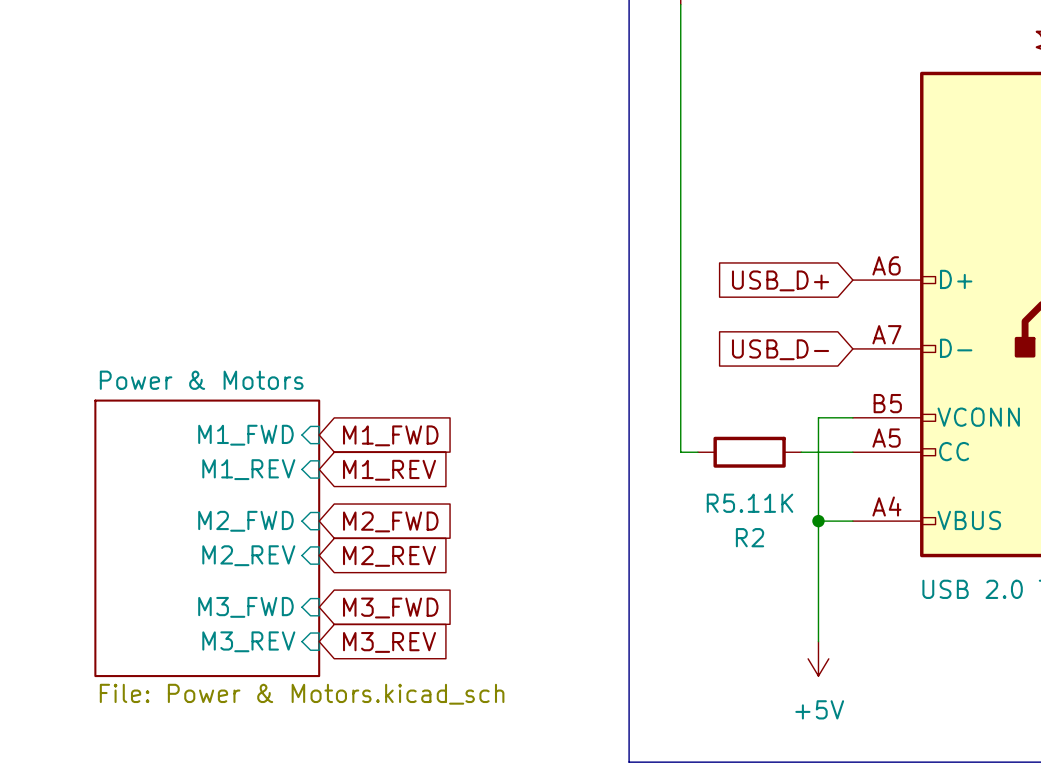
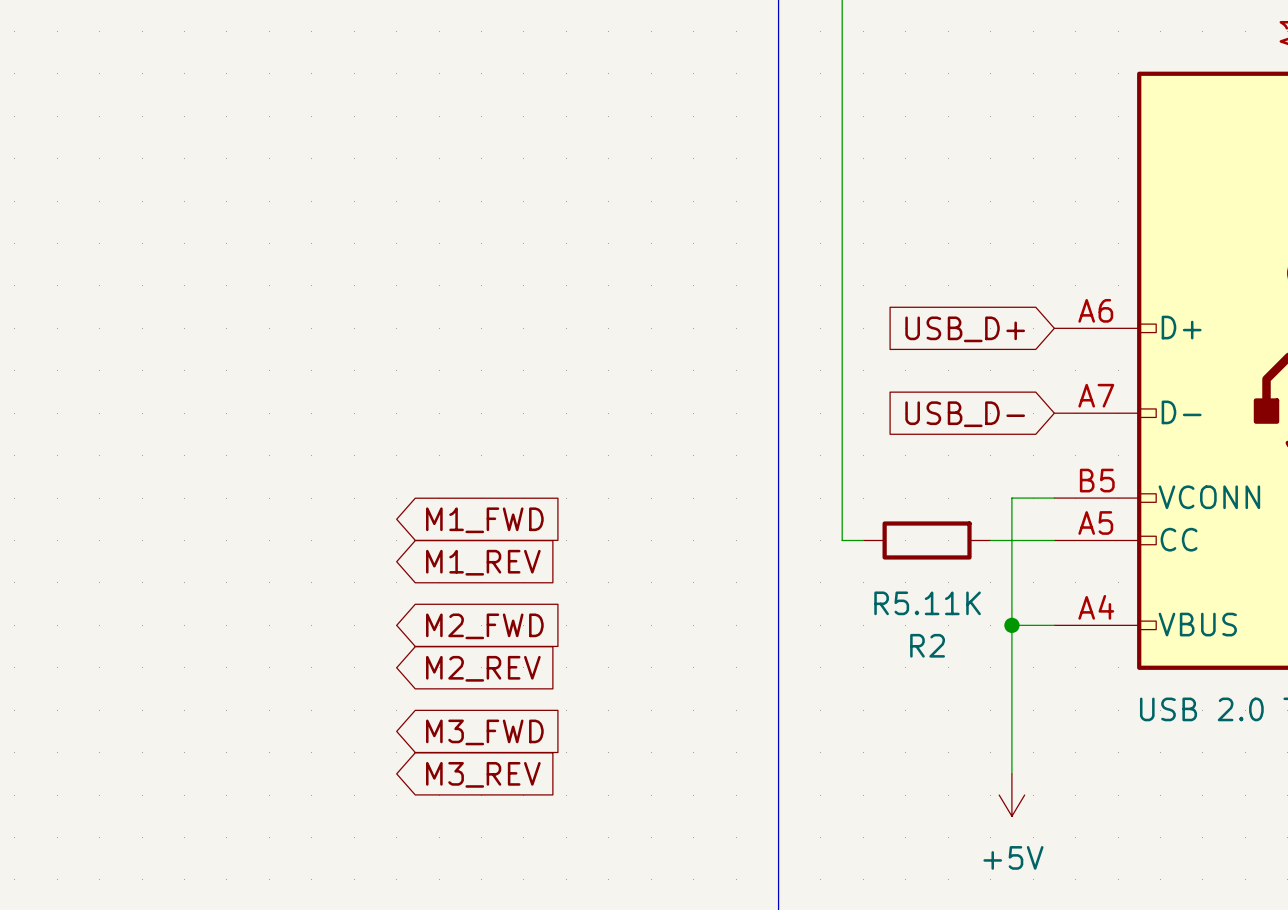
sheet pin: M1_FWD (245, 435) -> none
sheet pin: M1_REV (248, 469) -> none
sheet pin: M2_FWD (245, 521) -> none
sheet Power & Motors: File: Power & Motors.kicad_sch (207, 538) -> none
sheet pin: M2_REV (248, 555) -> none
sheet pin: M3_FWD (245, 607) -> none
sheet pin: M3_REV (248, 641) -> none

